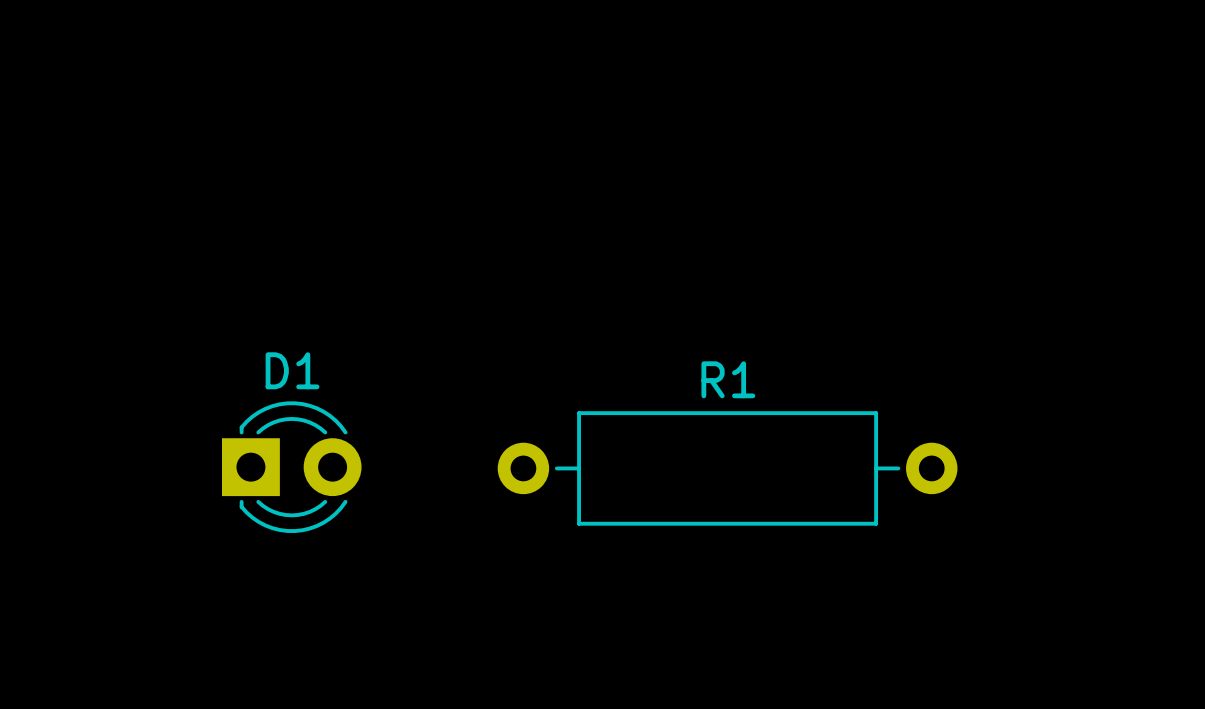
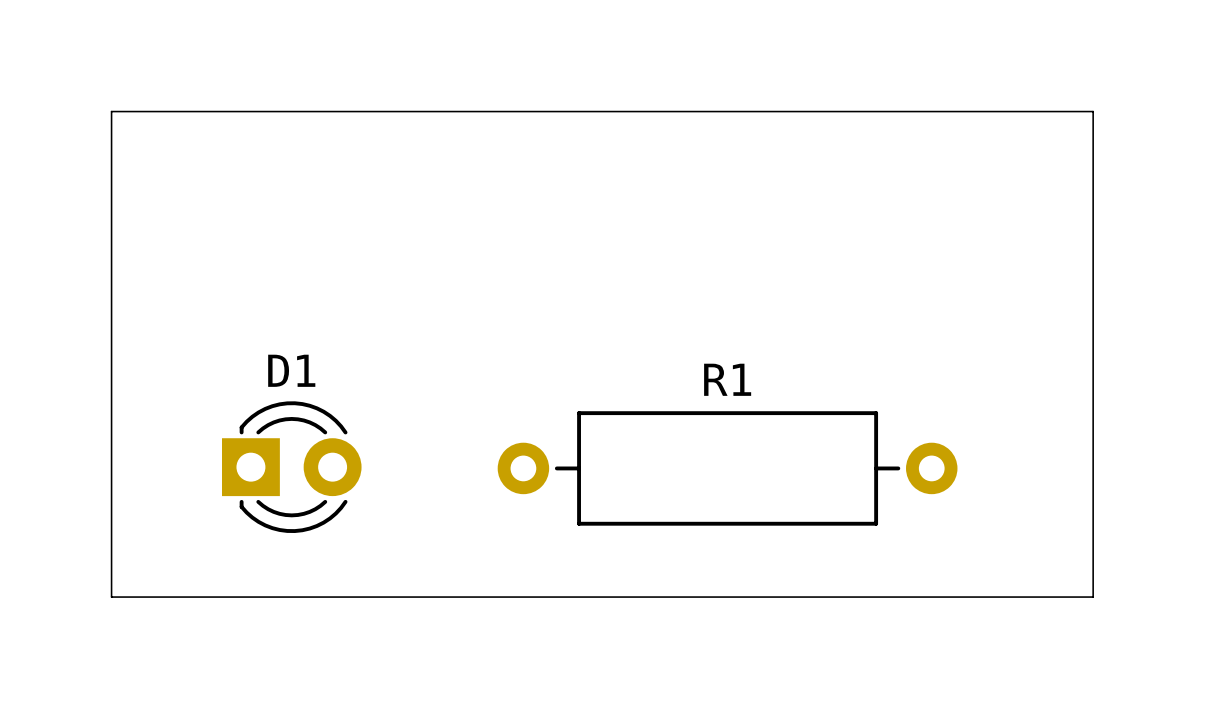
board edge: none -> (111, 111) (1093, 111) (1093, 597) (111, 597) (111, 111)

